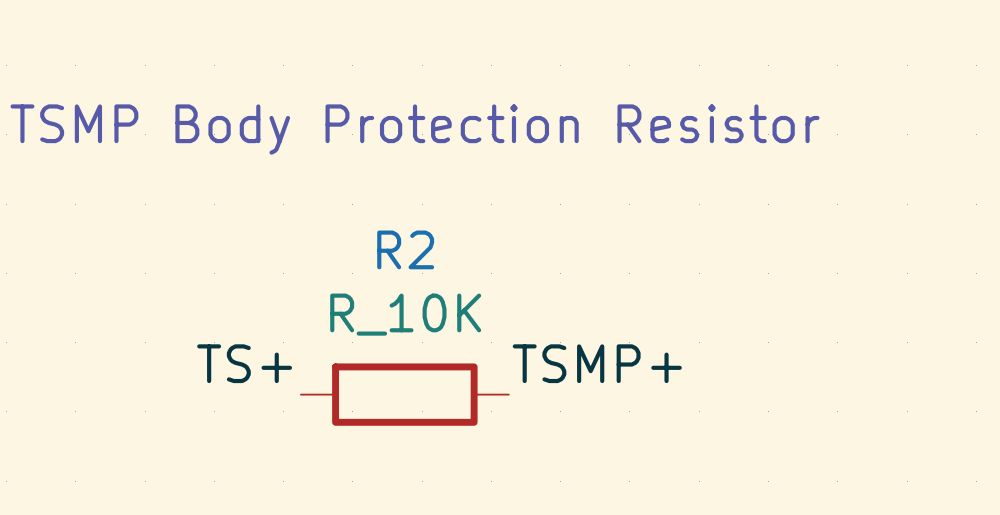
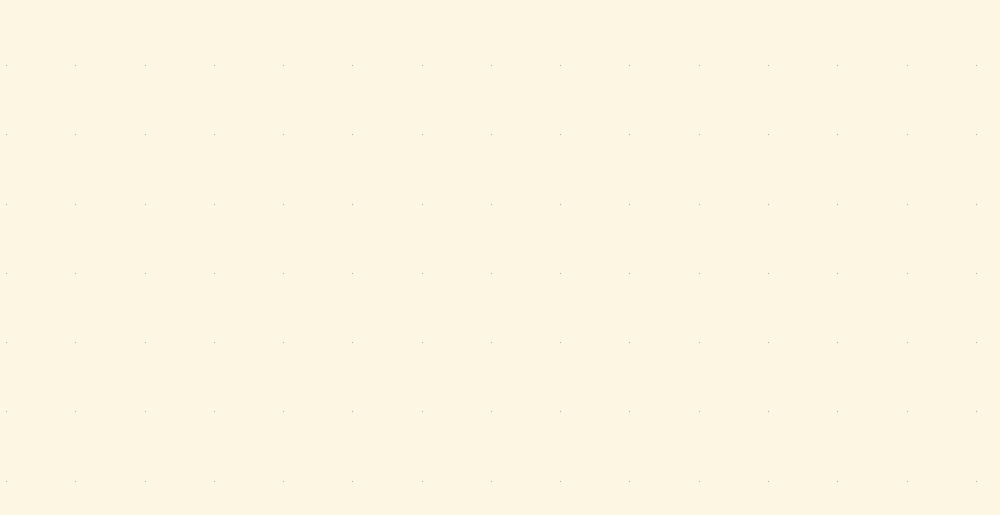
text: TSMP Body Protection Resistor (415, 129) -> none
label: TS+ (244, 363) -> none
label: TSMP+ (597, 363) -> none
R2: R_10K (404, 394) -> none

